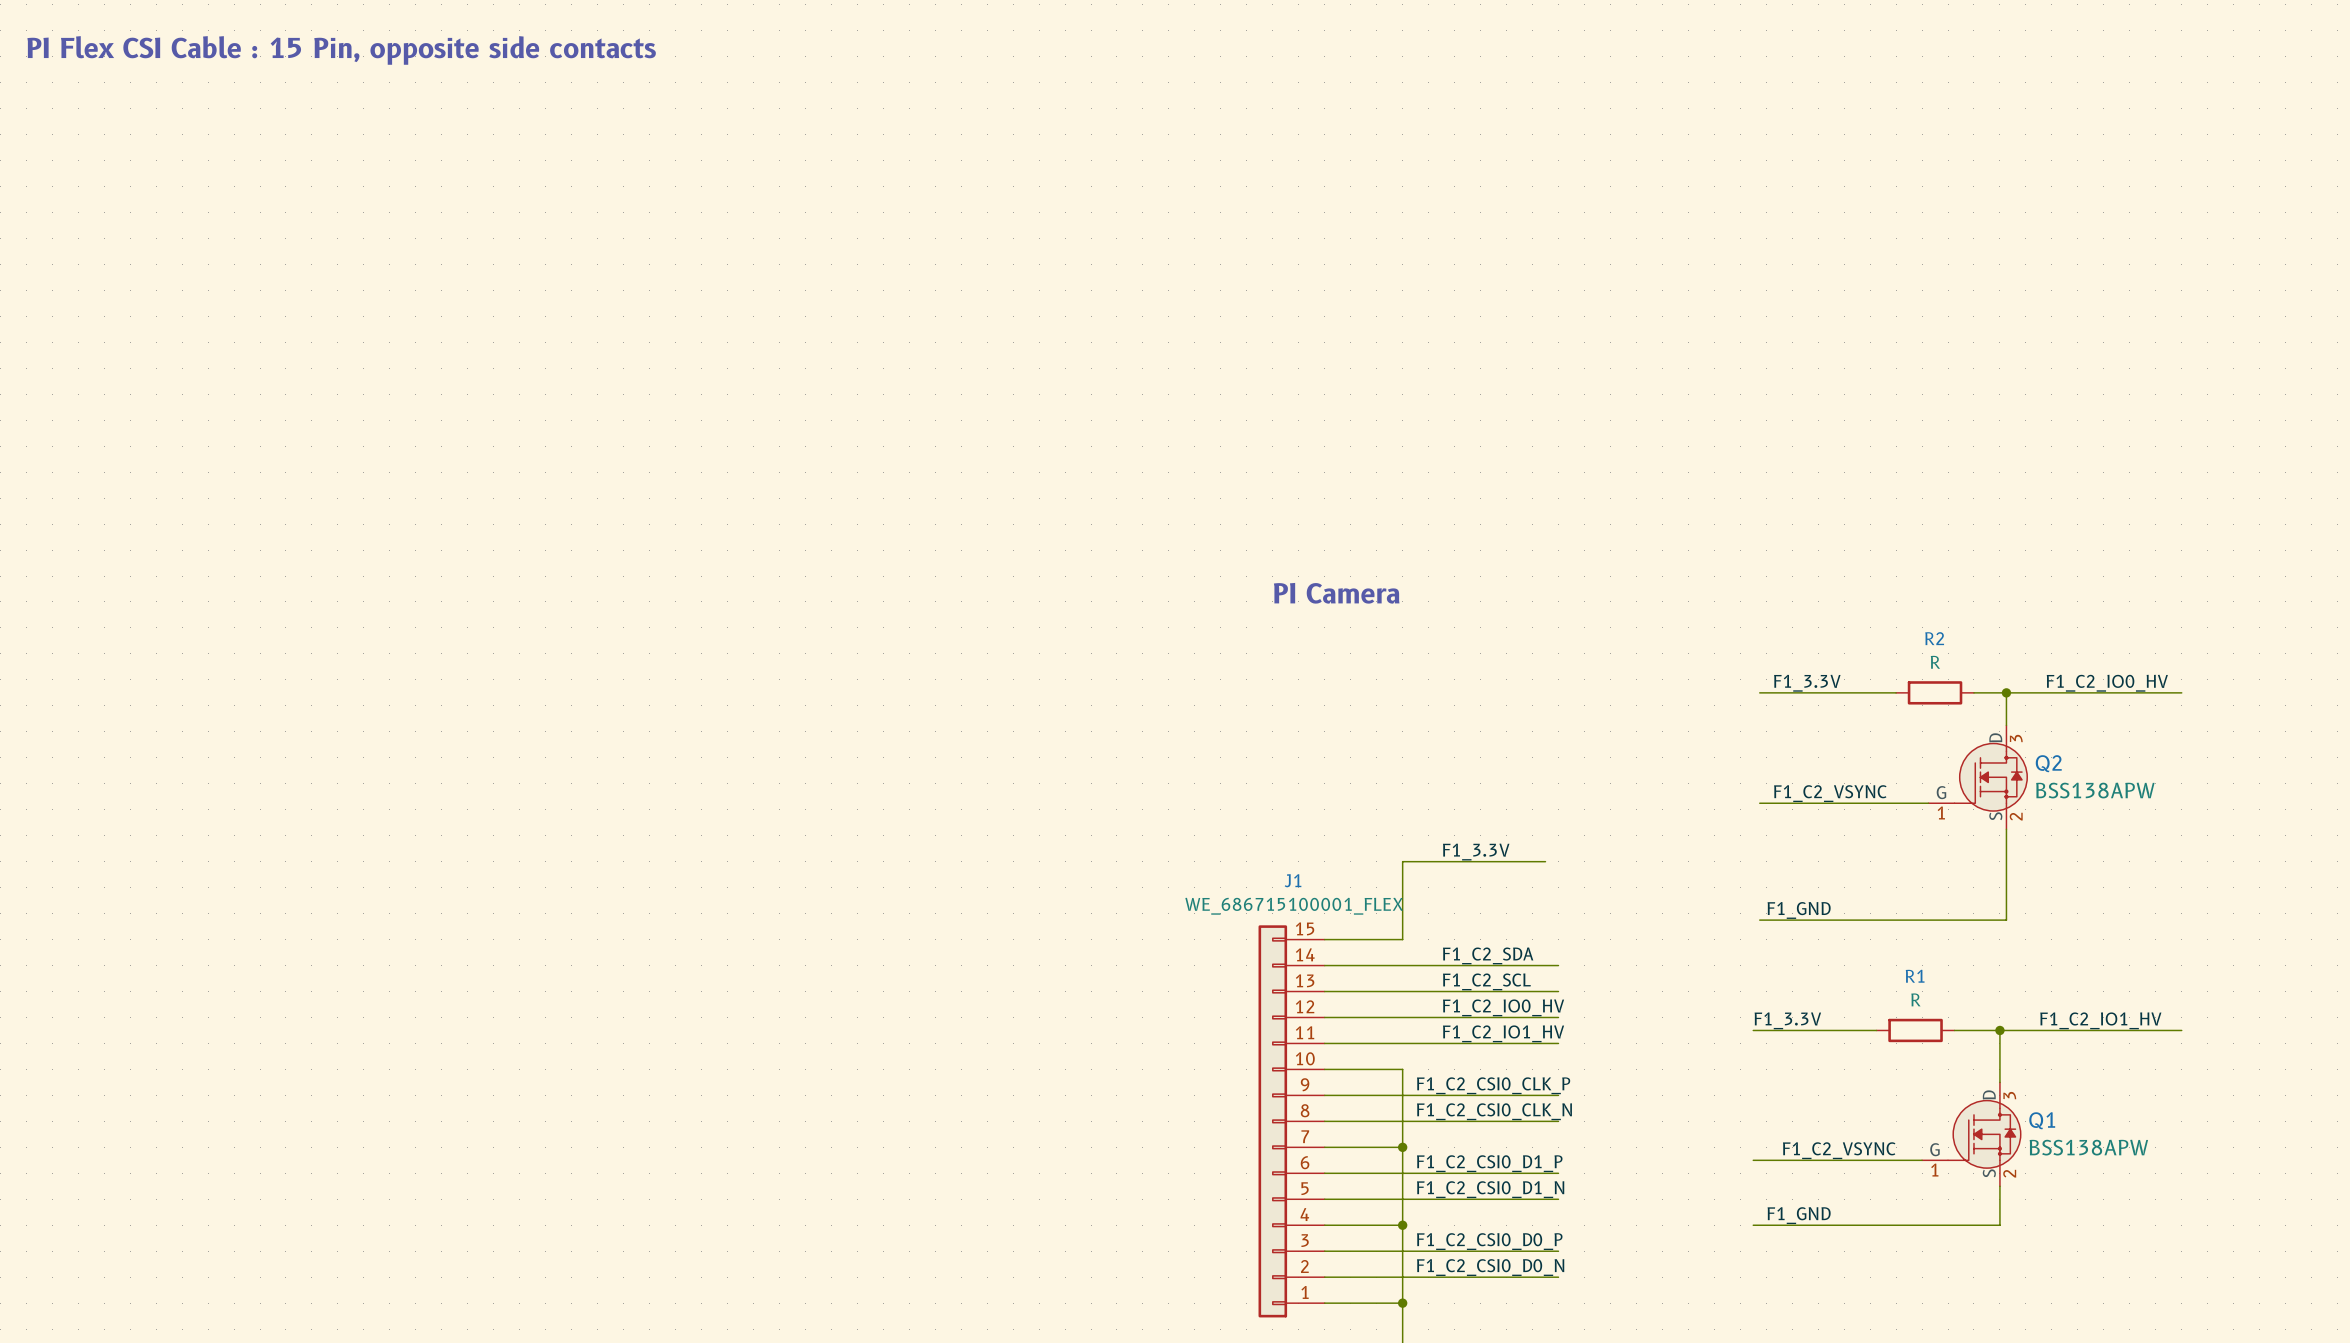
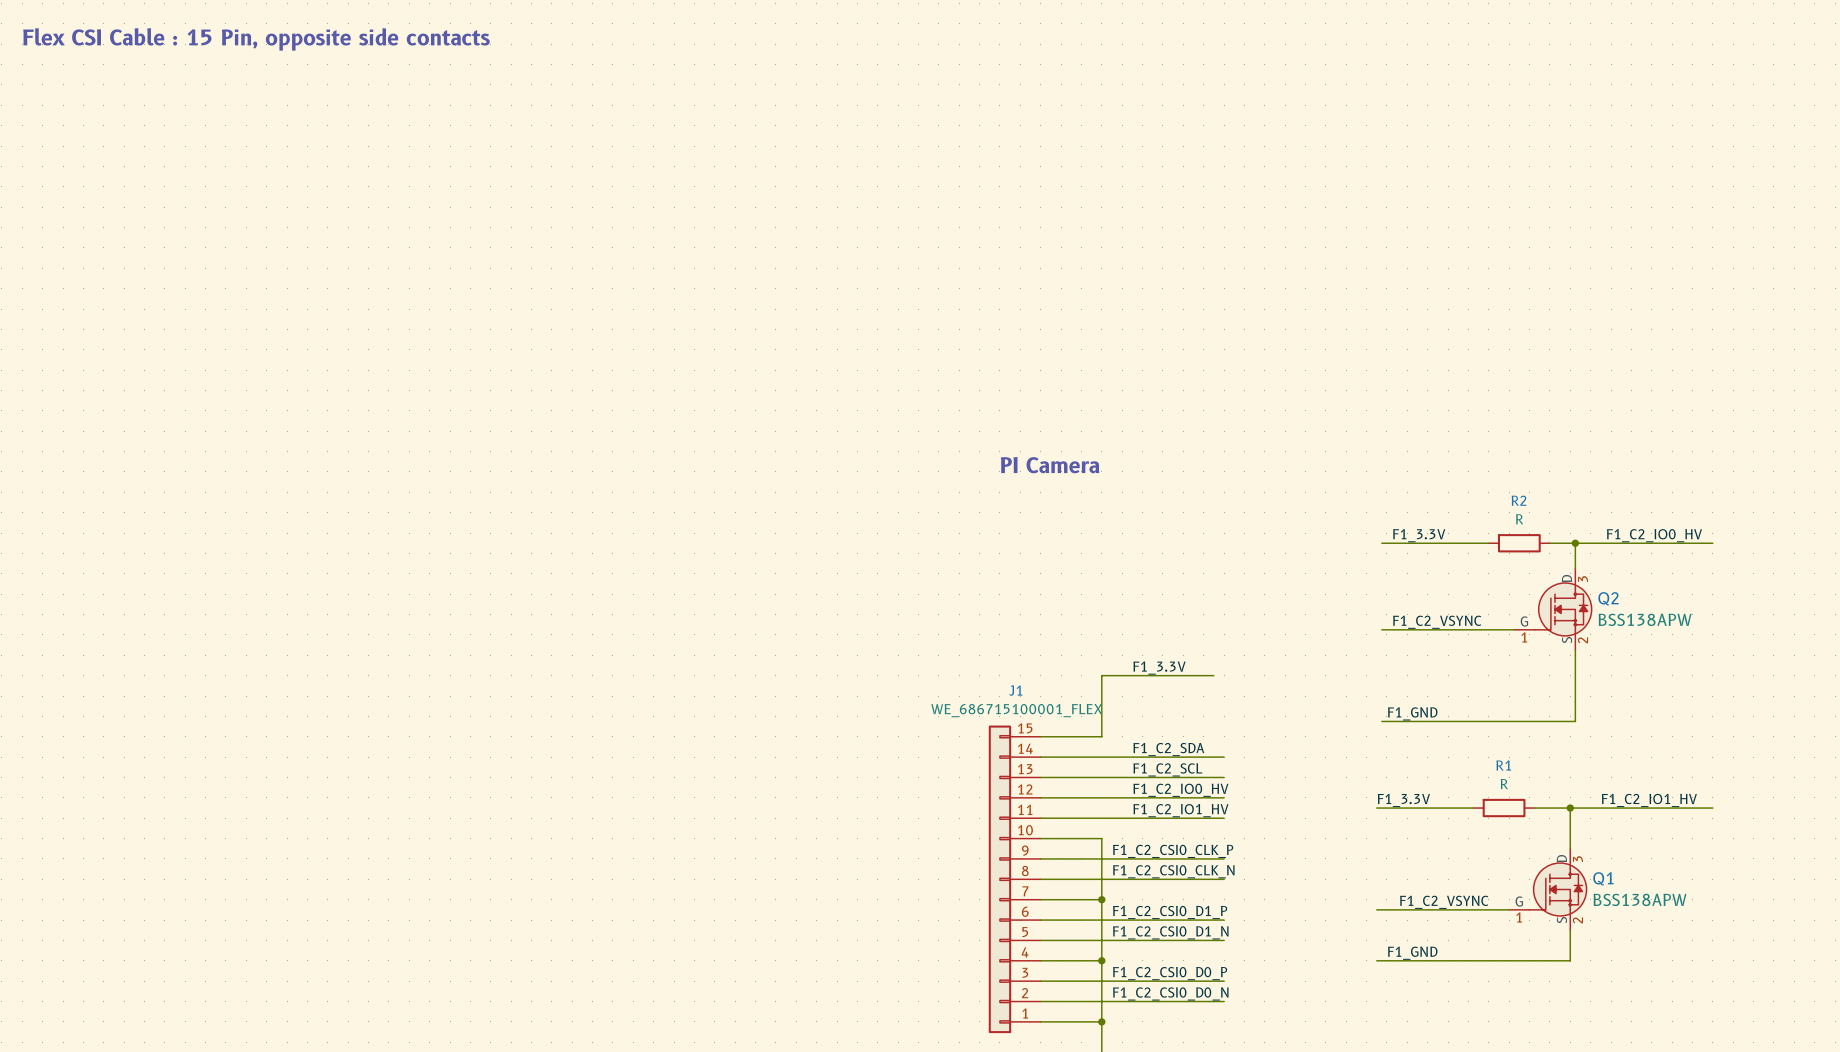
text: PI Flex CSI Cable : 15 Pin, opposite side contacts (341, 50) -> Flex CSI Cable : 15 Pin, opposite side contacts (256, 39)

